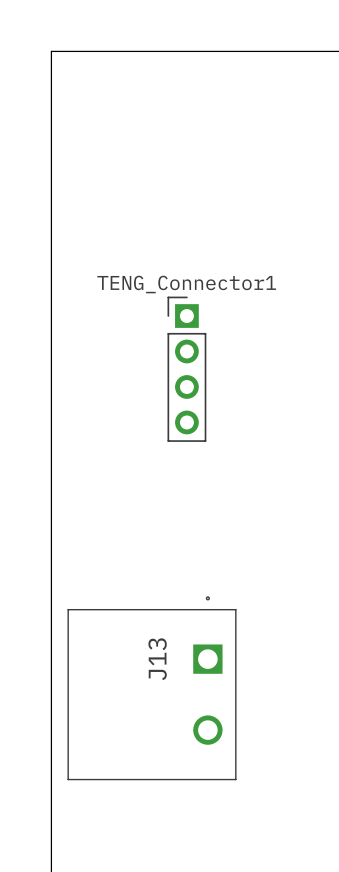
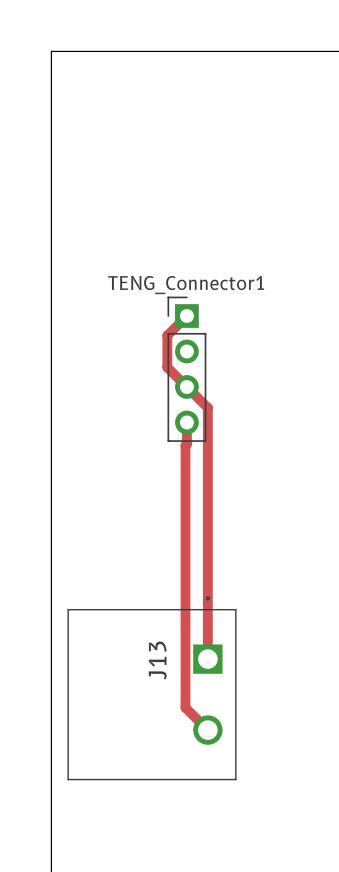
track: none -> (186, 316) (167, 335) (167, 367) (207, 407) (207, 659)
track: none -> (186, 422) (185, 707) (207, 730)

